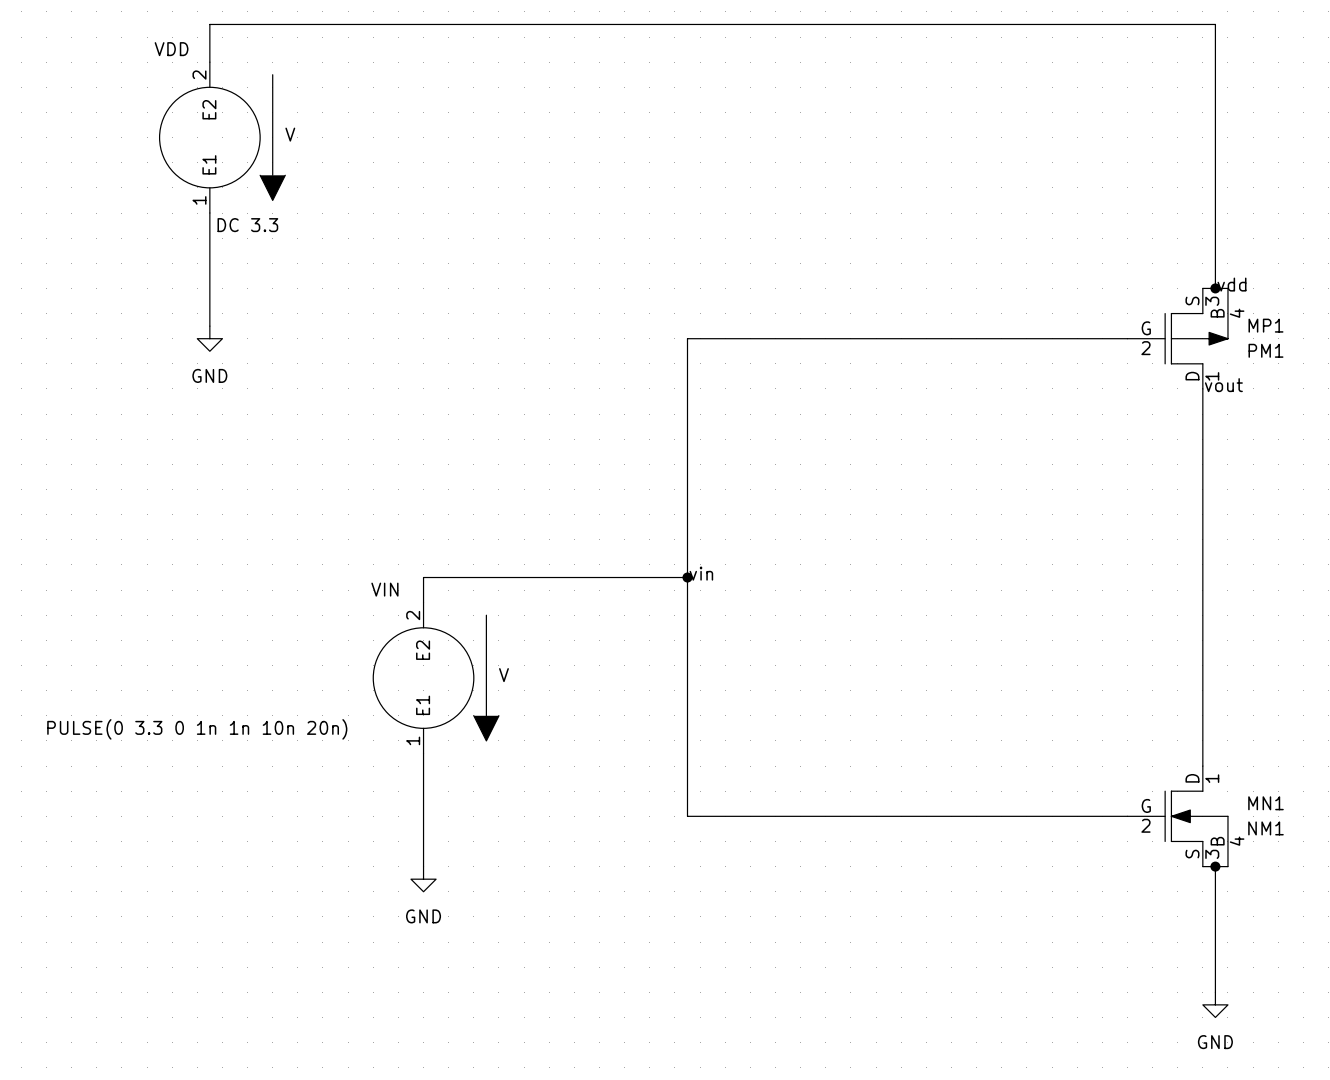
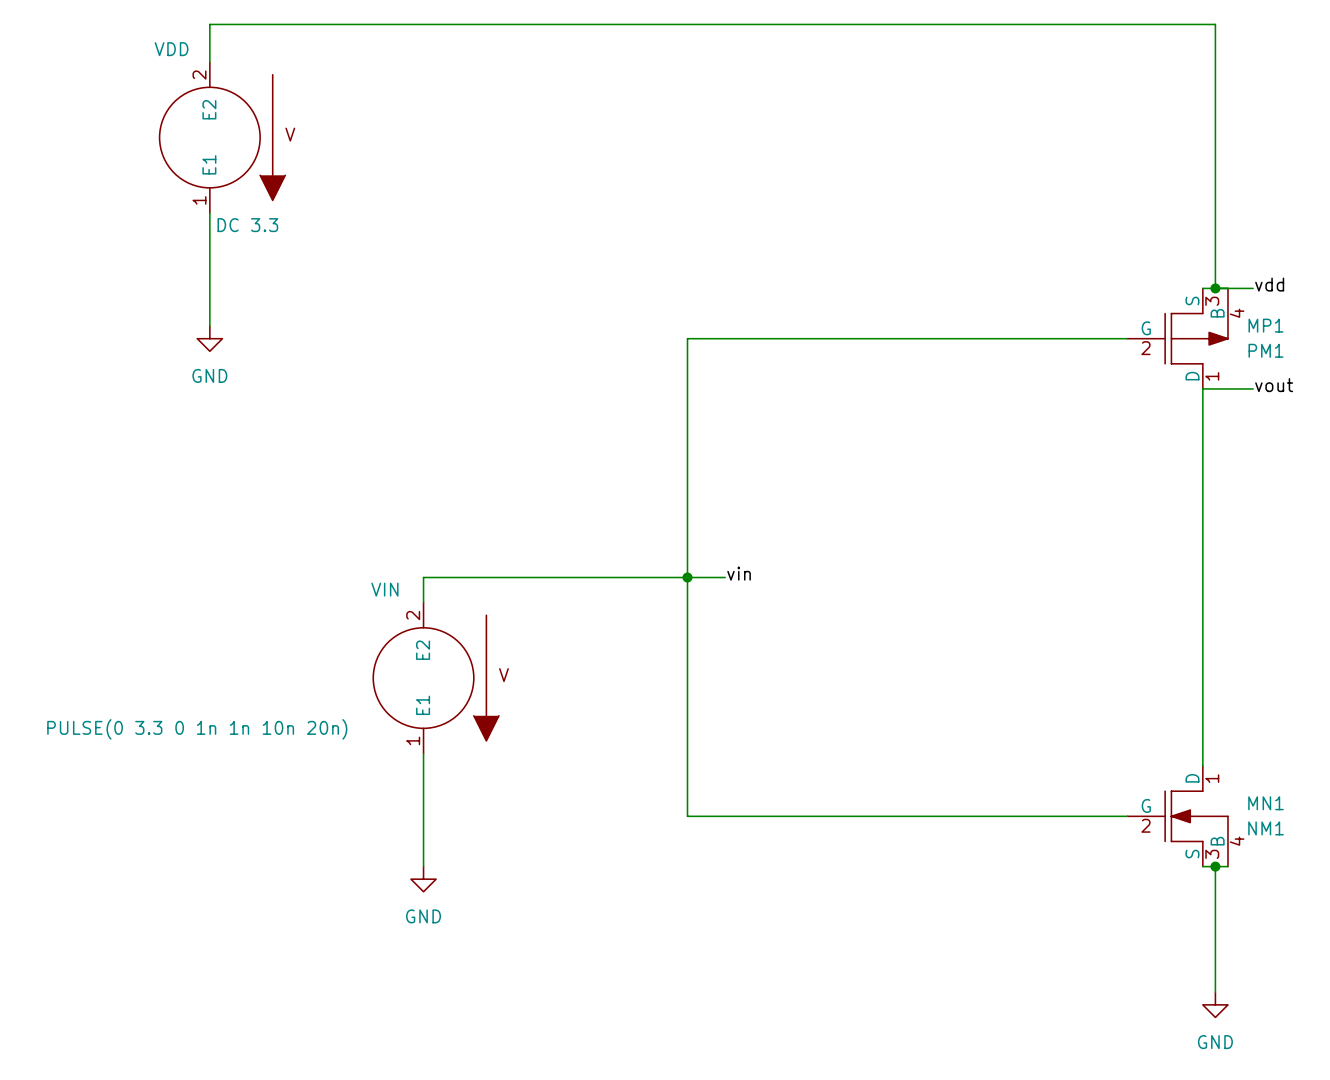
label position: vdd (1231, 284) -> vdd (1269, 284)
wire: none -> (1227, 288) (1253, 288)
label position: vout (1223, 385) -> vout (1274, 385)
wire: none -> (1202, 388) (1253, 388)
label position: vin (701, 573) -> vin (739, 573)
wire: none -> (687, 577) (725, 577)

